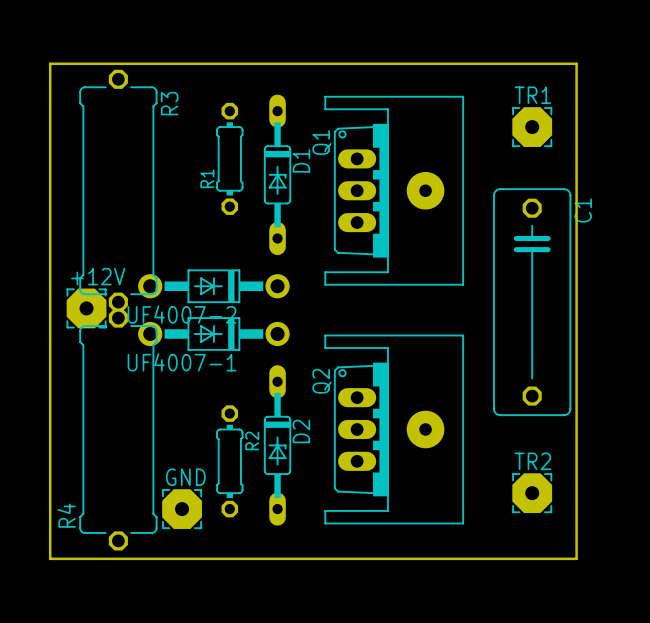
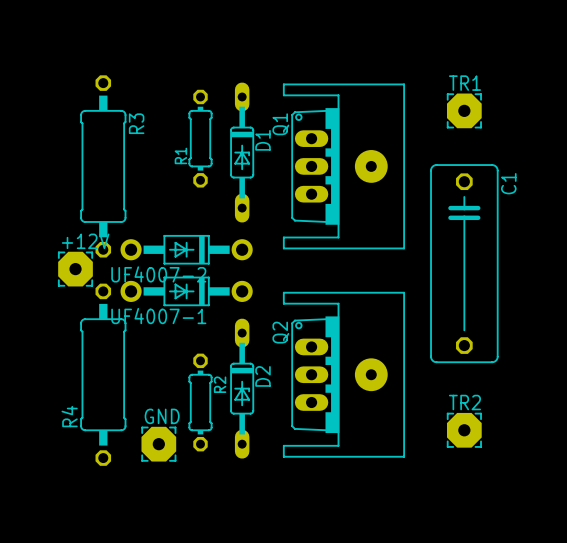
board edge: (50, 63) (576, 63) (576, 558) (50, 558) (50, 63) -> none
R3 footprint: [79, 69, 158, 312] -> [80, 75, 127, 258]
R3 name position: R3 (169, 103) -> R3 (136, 123)
R4 footprint: [79, 308, 158, 551] -> [80, 283, 127, 466]
R4 name position: R4 (66, 515) -> R4 (69, 416)

